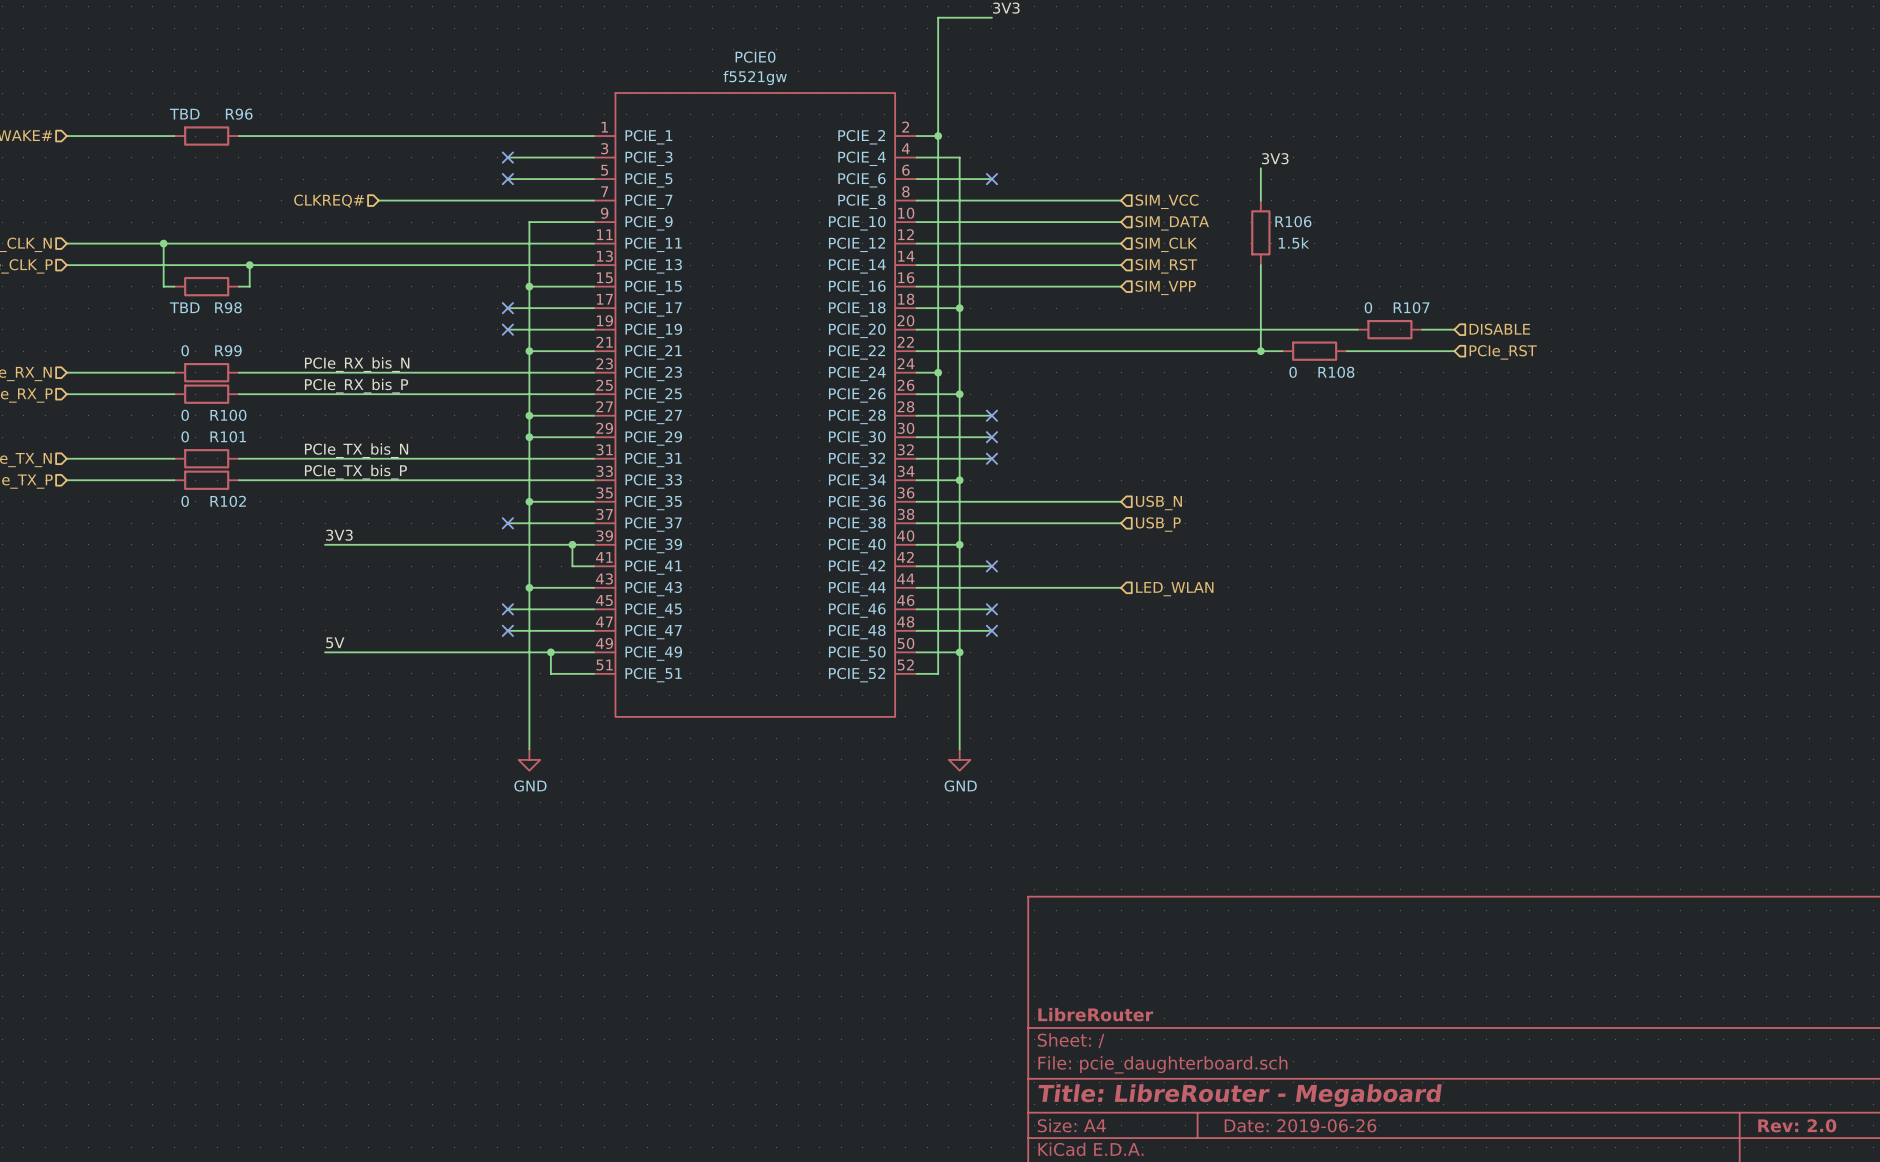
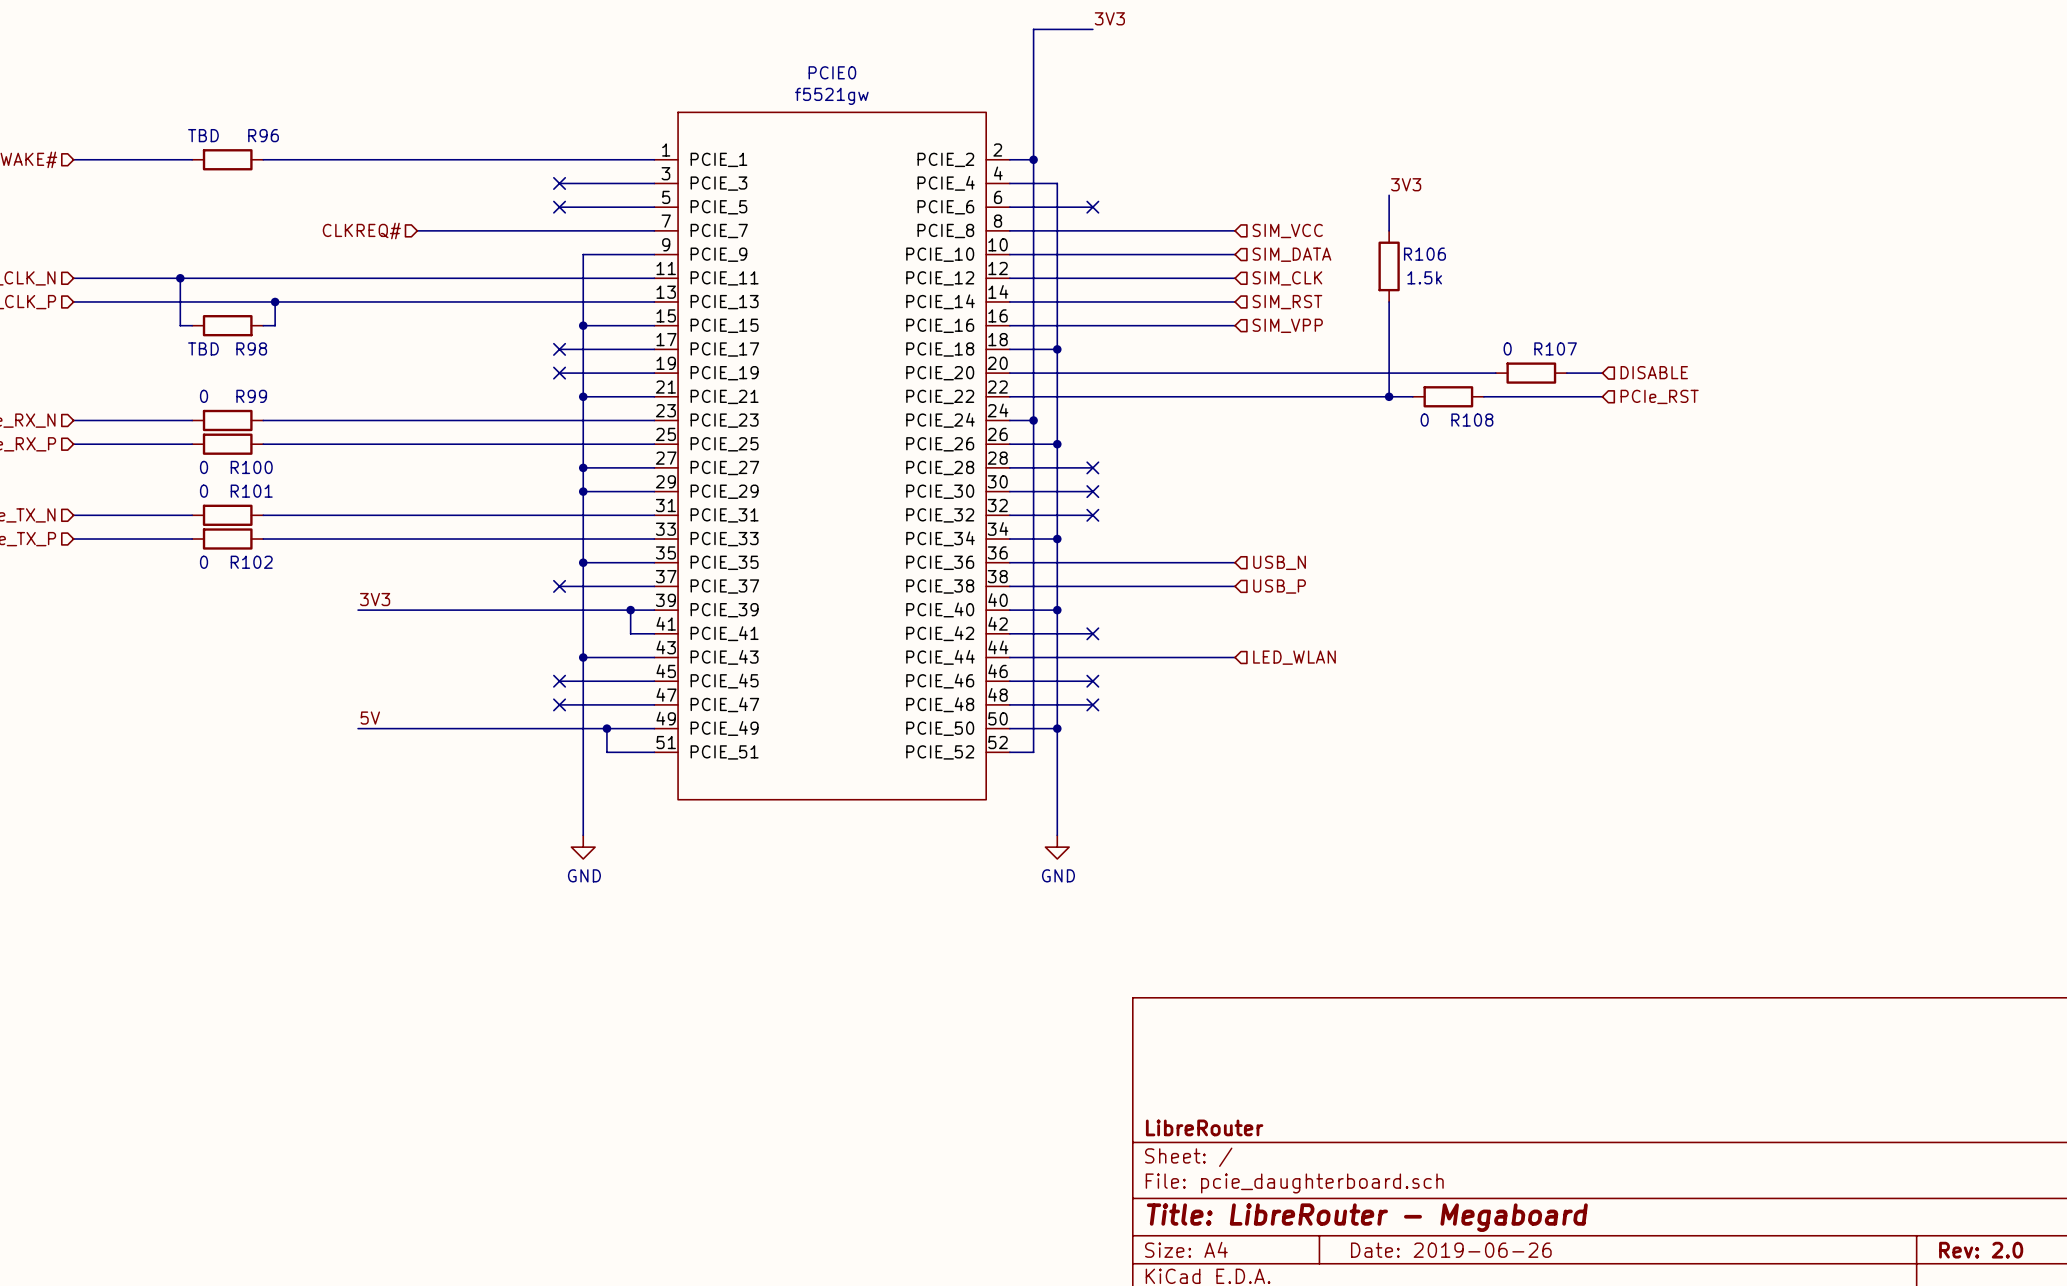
label: PCIe_RX_bis_N (357, 364) -> none
label: PCIe_RX_bis_P (356, 386) -> none
label: PCIe_TX_bis_N (356, 450) -> none
label: PCIe_TX_bis_P (355, 472) -> none

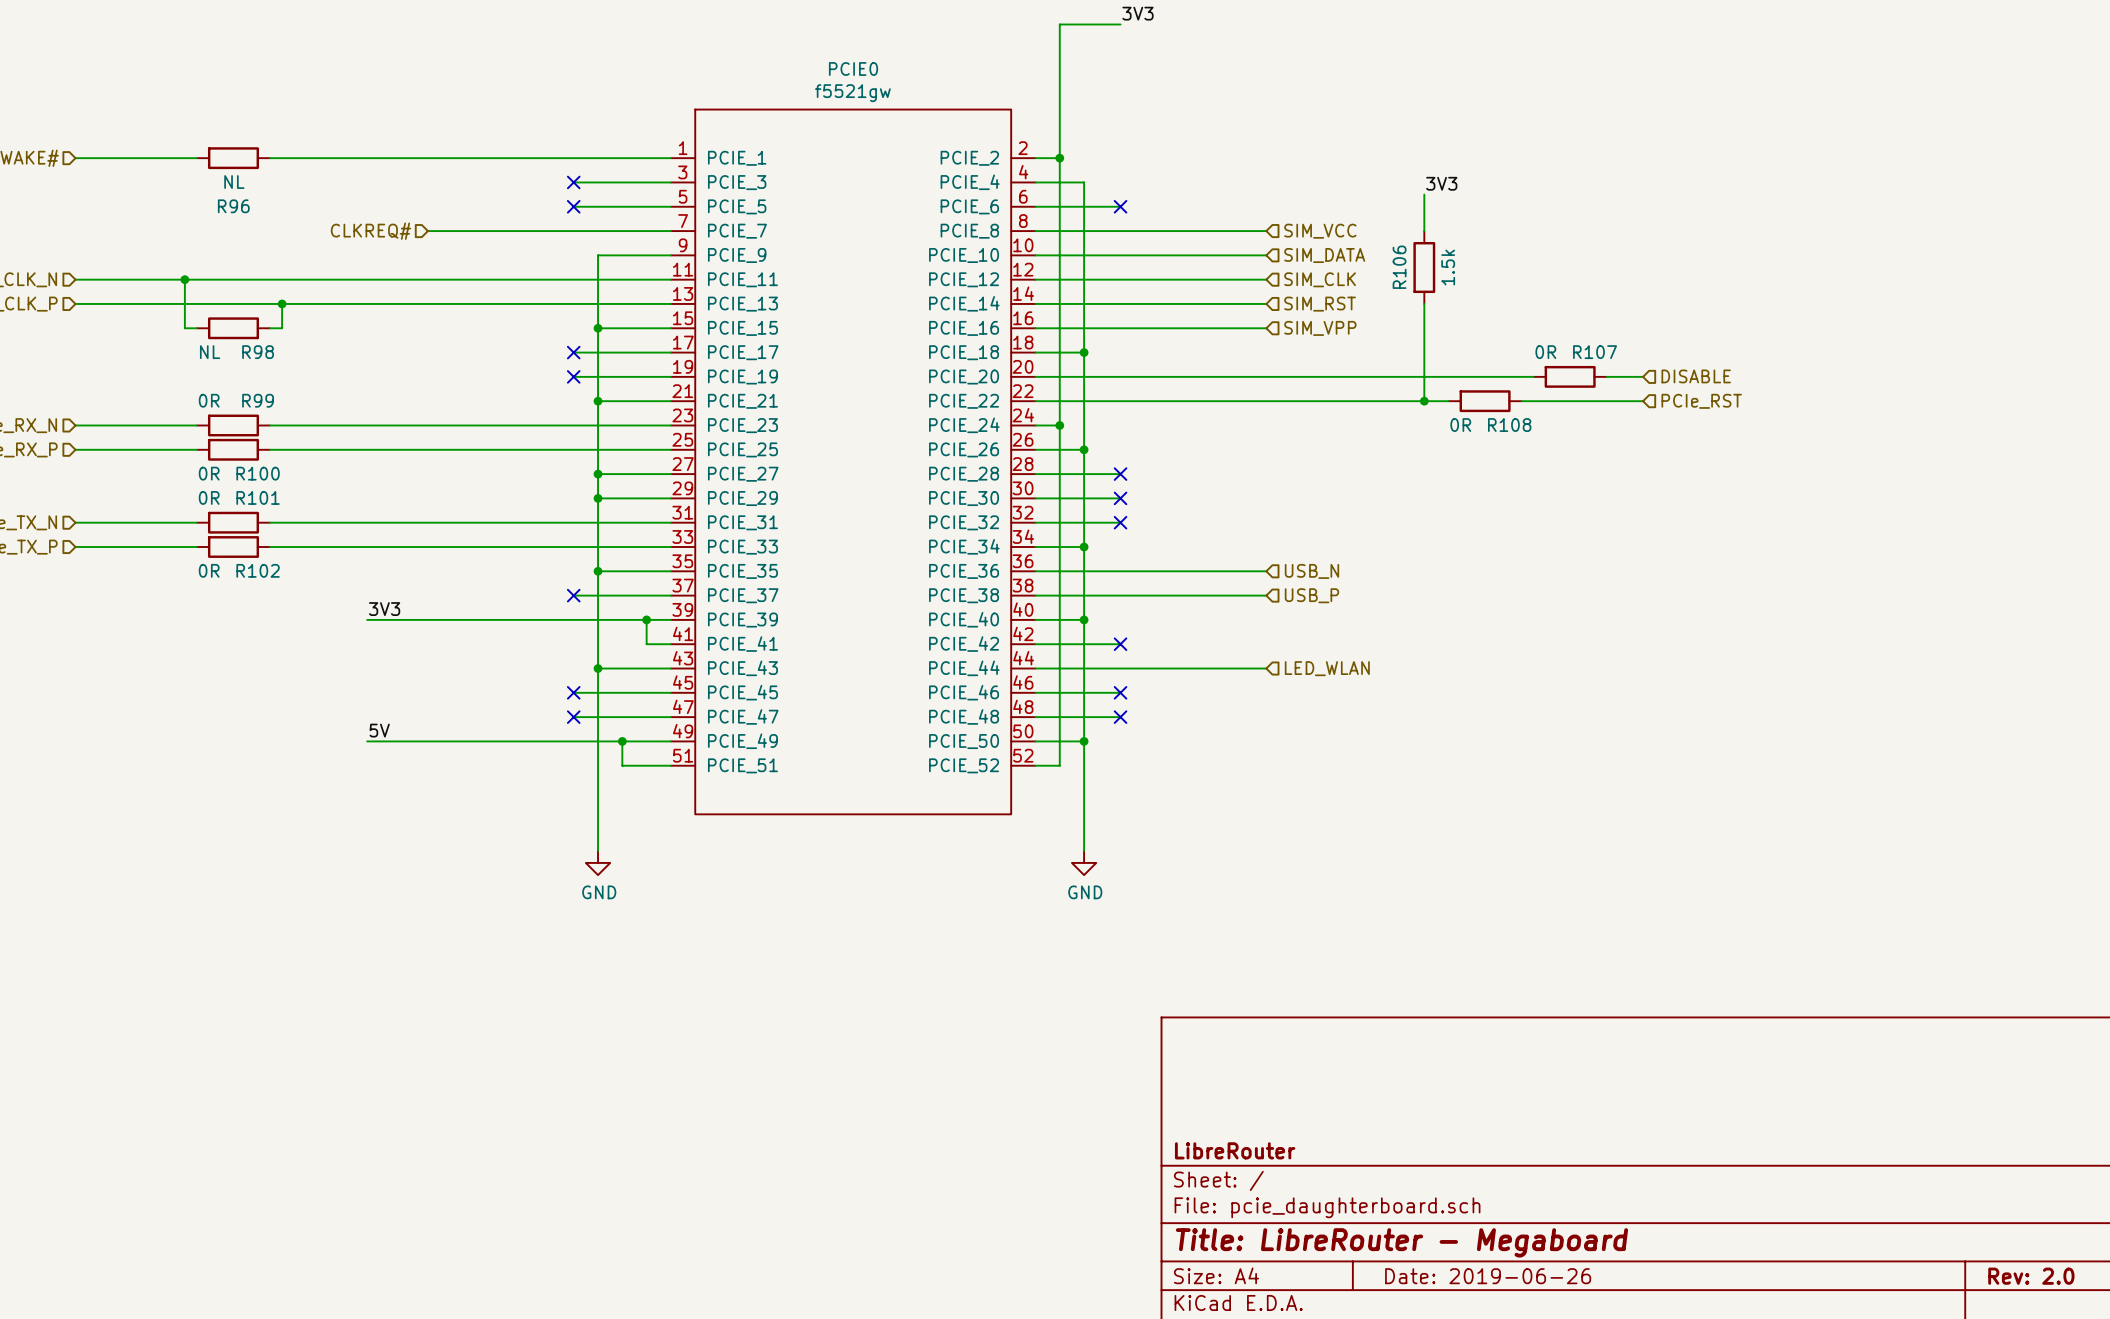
R96 value: TBD (203, 135) -> NL (234, 182)
R96 name position: R96 (263, 135) -> R96 (233, 206)
R106 name rotation: 0° (1424, 254) -> 90° counterclockwise (1399, 267)
R106 name position: R106 (1424, 254) -> R106 (1399, 267)
R106 value rotation: 0° (1424, 277) -> 90° counterclockwise (1448, 267)
R98 value: TBD (203, 348) -> NL (210, 352)
R107 value: 0 (1507, 348) -> 0R (1545, 352)
R99 value: 0 (204, 396) -> 0R (209, 400)
R108 value: 0 (1424, 420) -> 0R (1460, 425)
R100 value: 0 (204, 467) -> 0R (209, 473)
R101 value: 0 (204, 491) -> 0R (209, 497)
R102 value: 0 (204, 562) -> 0R (209, 570)

